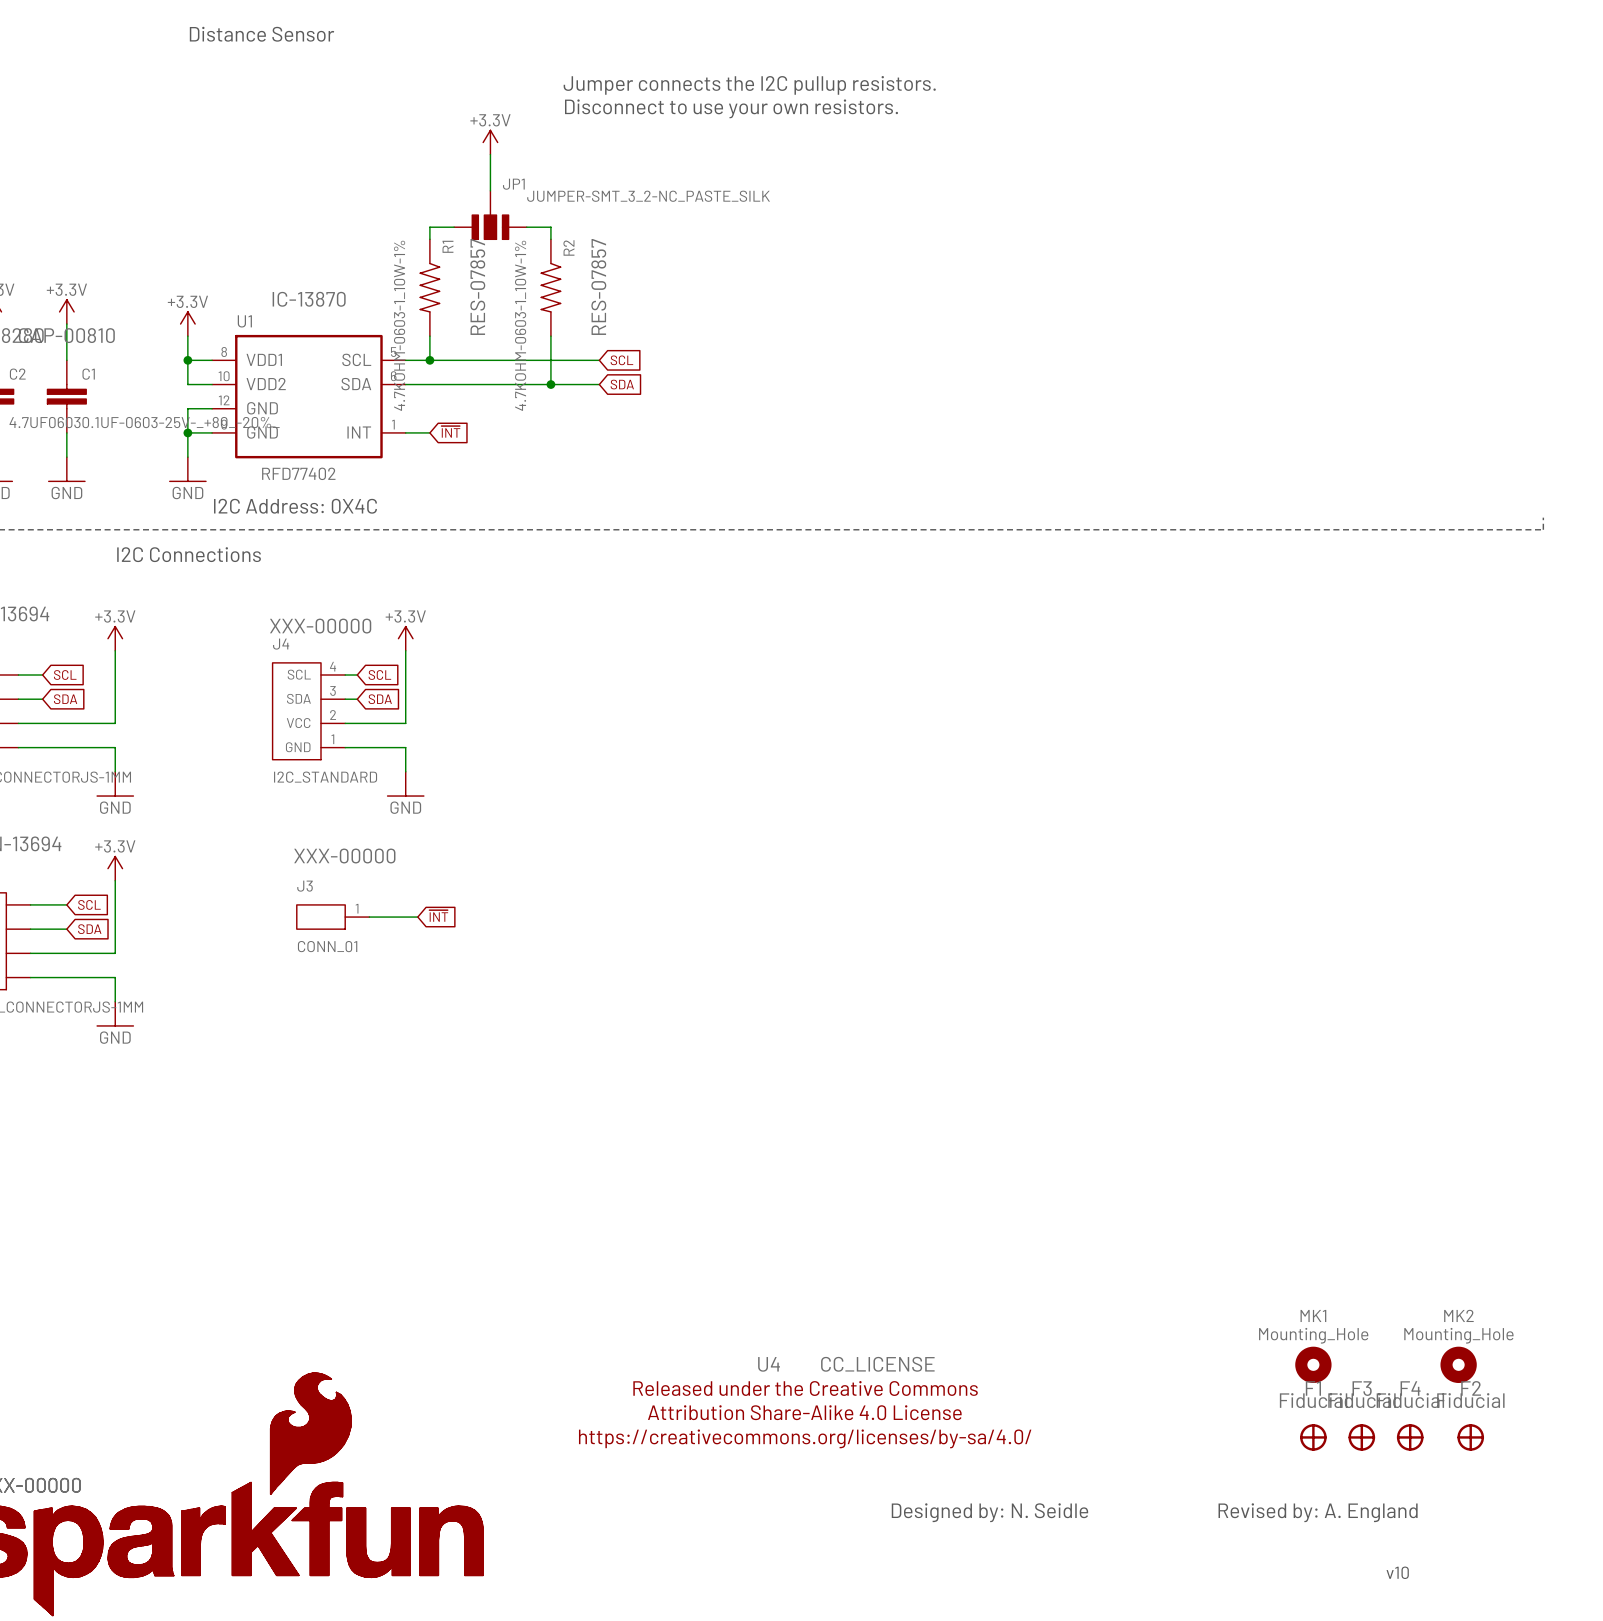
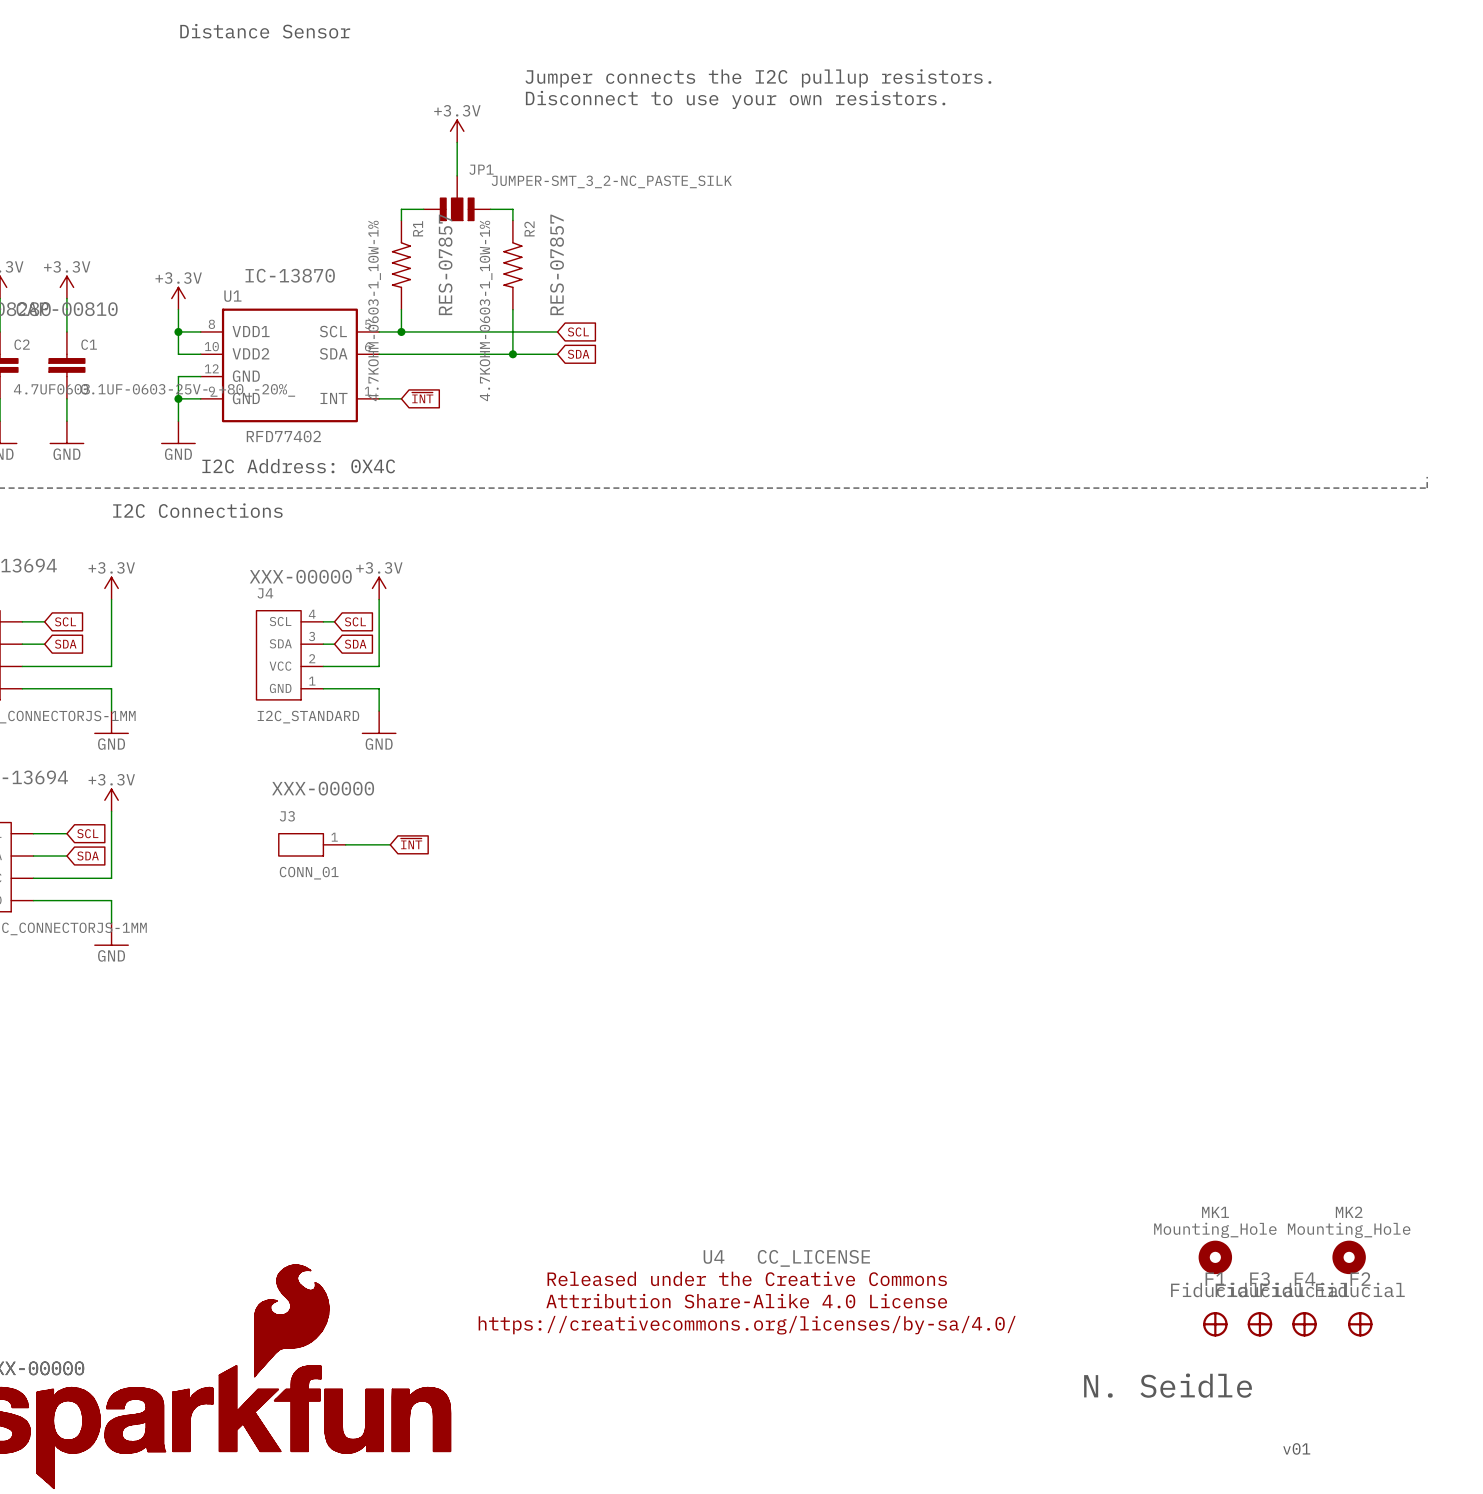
text: none -> N. Seidle (1168, 1385)
text: Designed by: N. Seidle (989, 1512) -> none
text: Revised by: A. England (1318, 1512) -> none
text: v10 (1397, 1572) -> v01 (1296, 1448)

